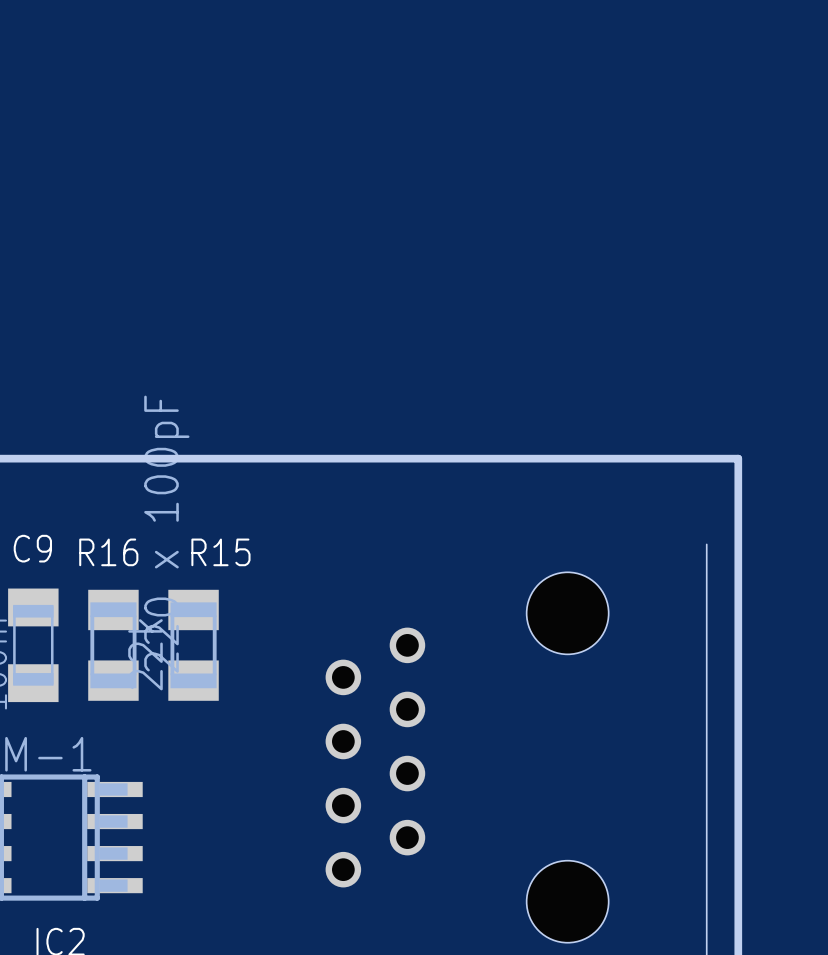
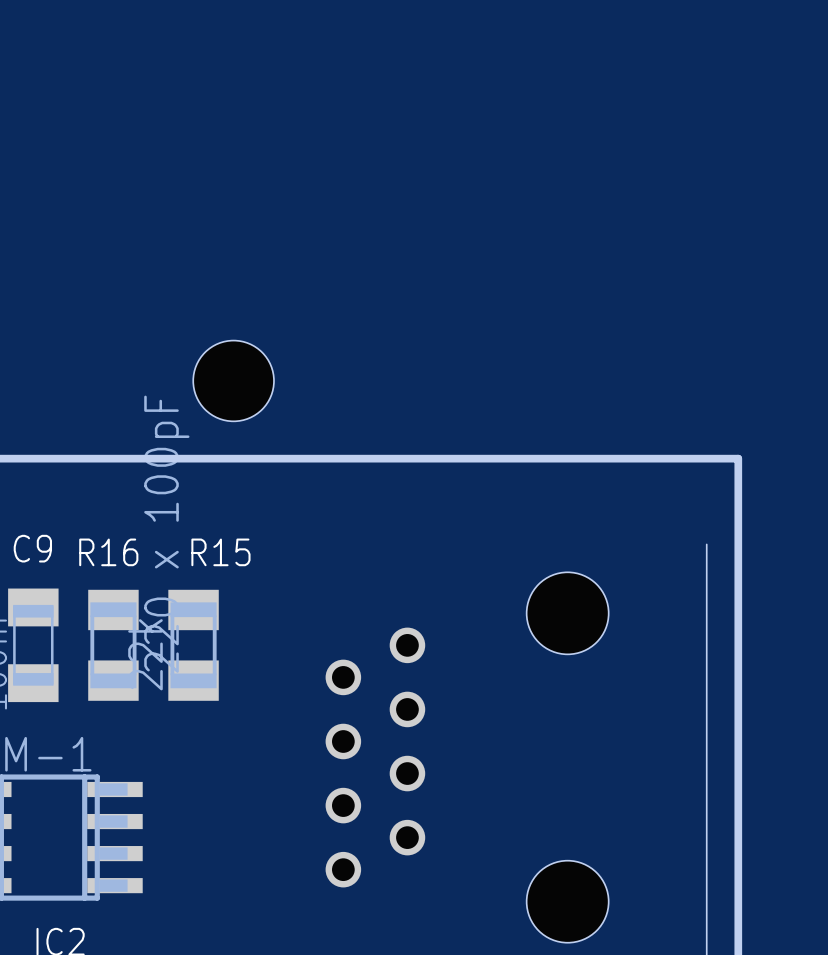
hole: none -> (233, 380)

